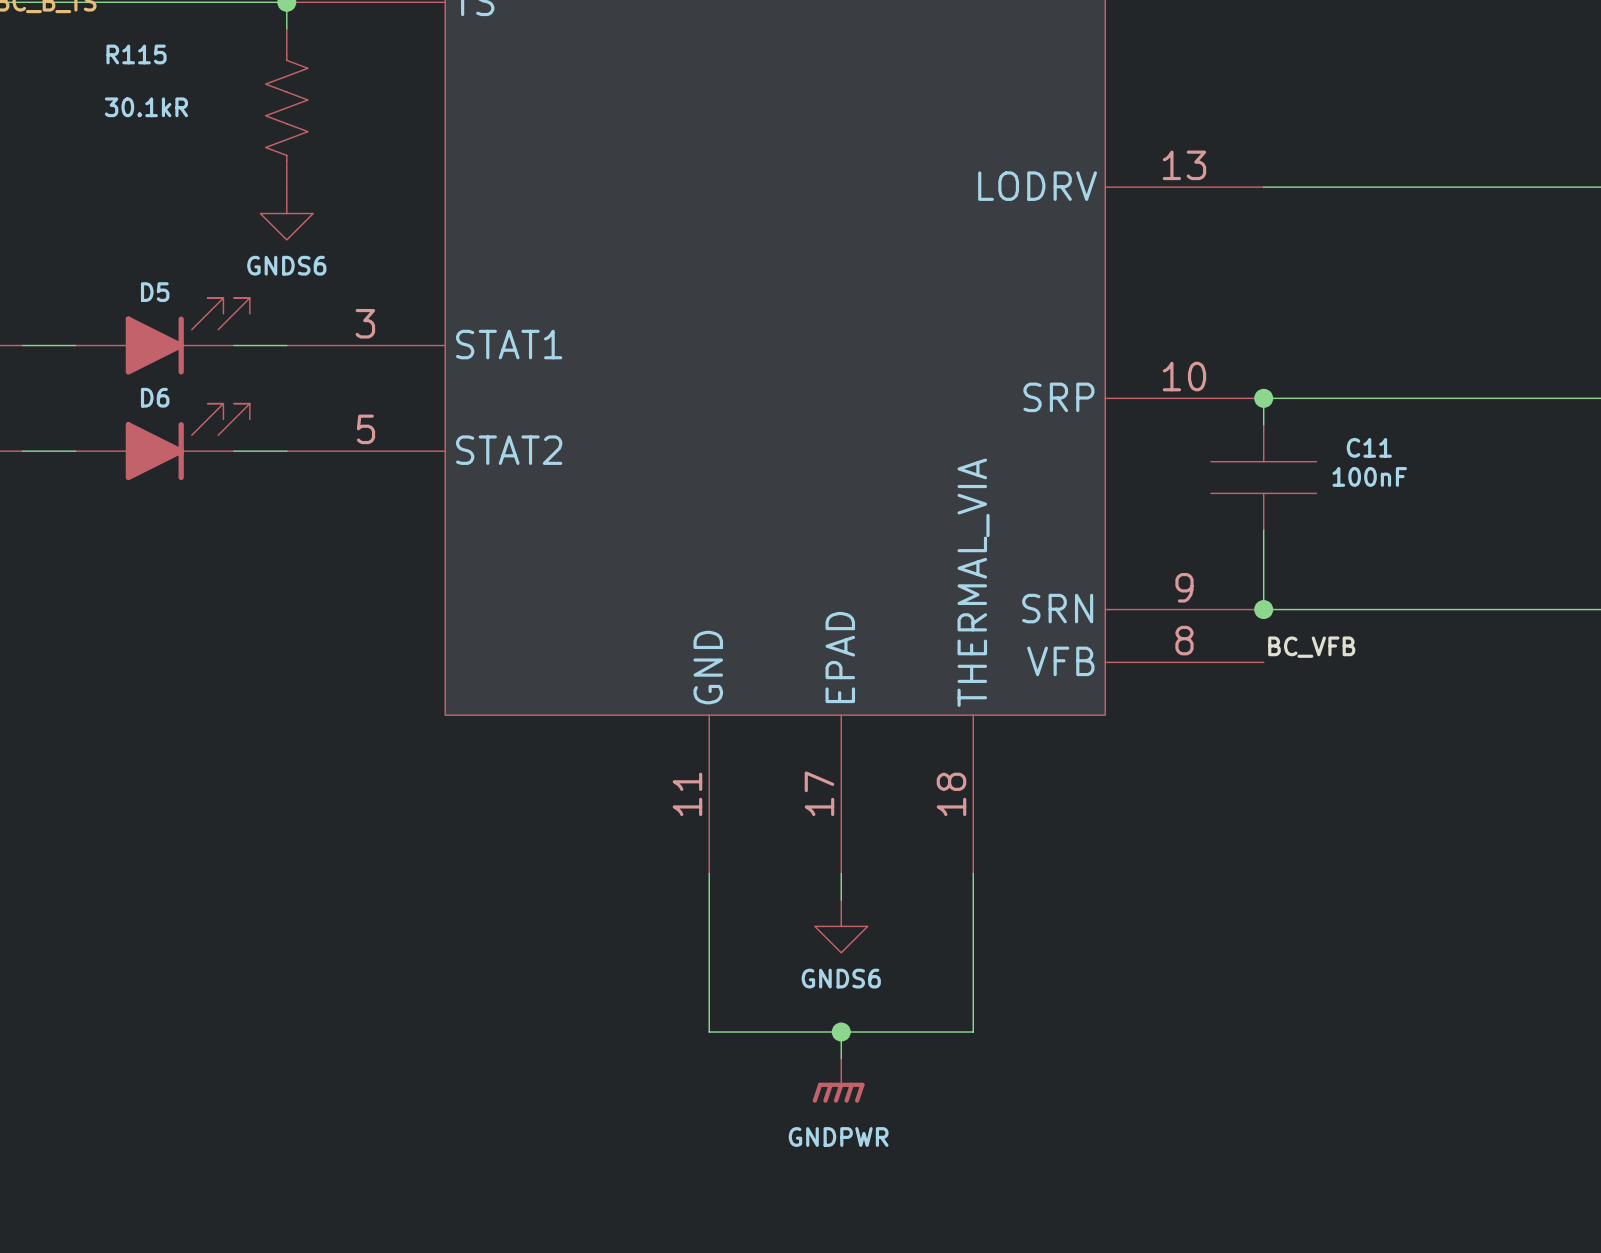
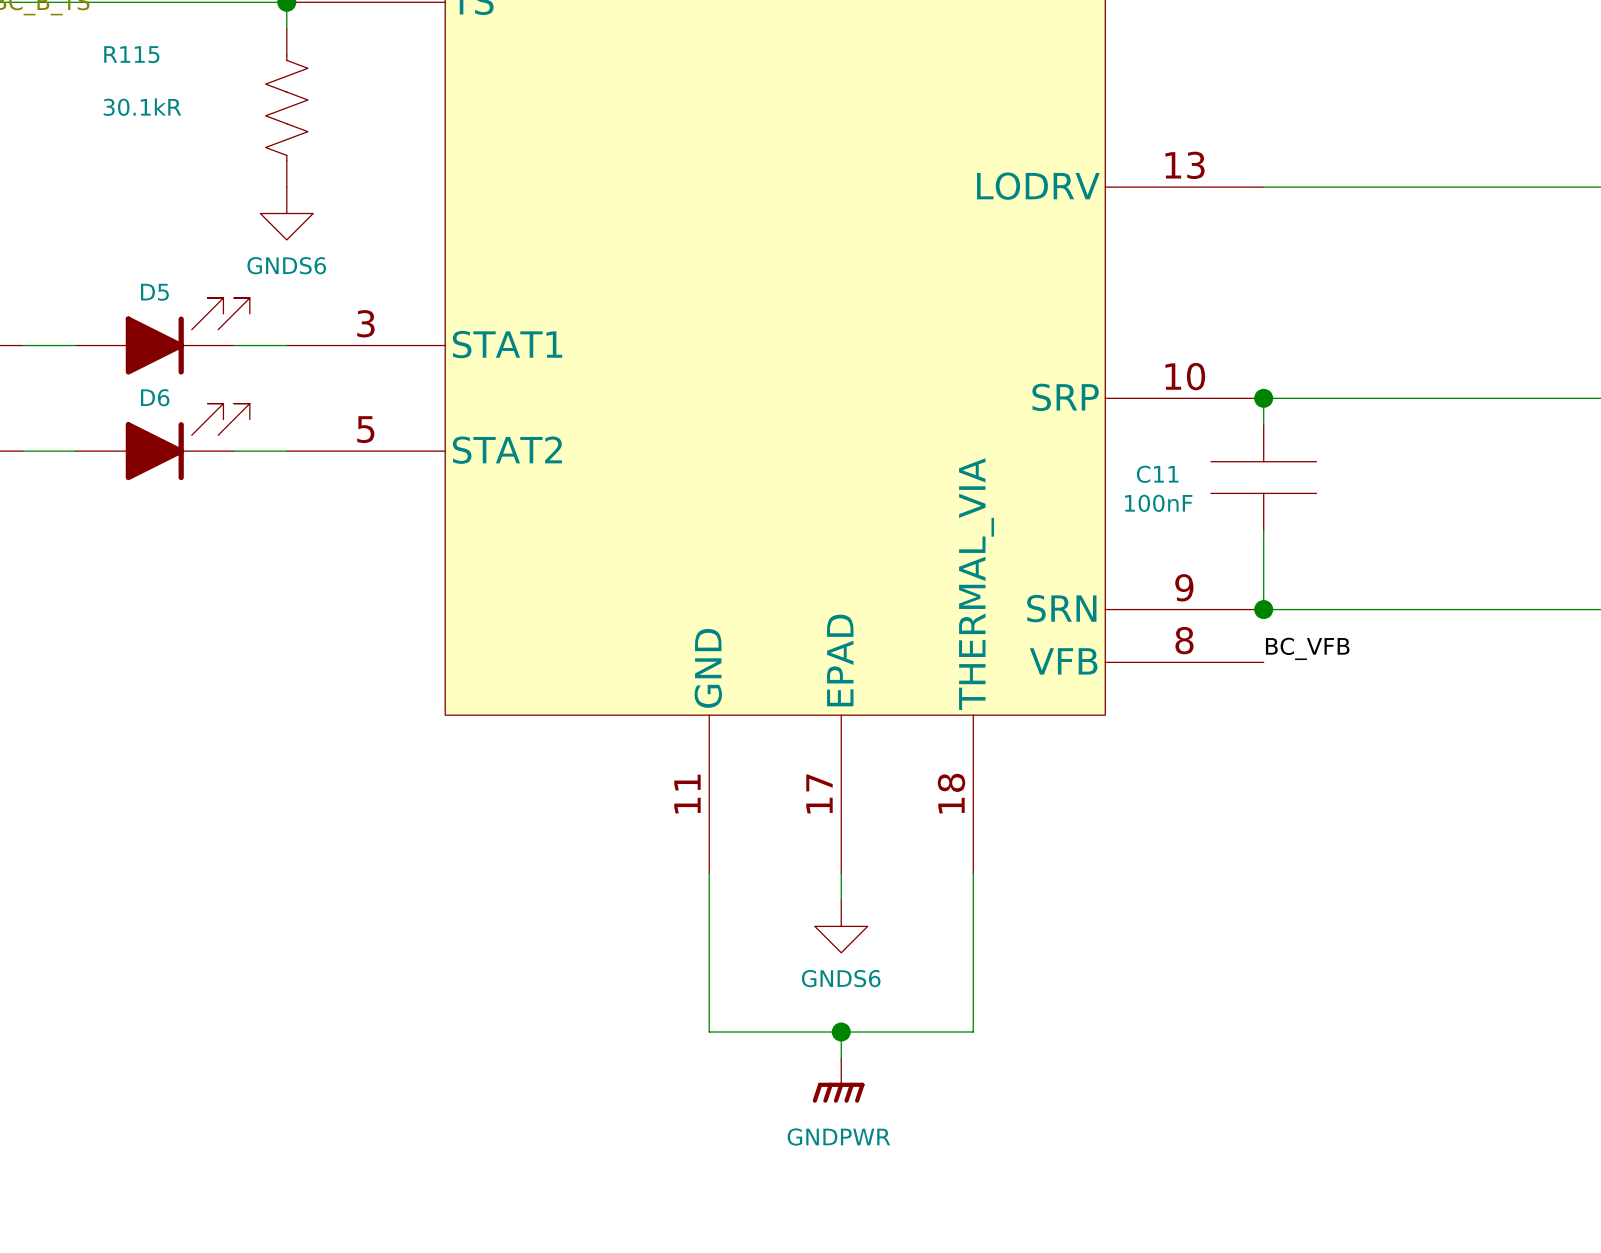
C11 name position: C11 (1369, 447) -> C11 (1157, 474)
C11 value position: 100nF (1369, 476) -> 100nF (1158, 503)

